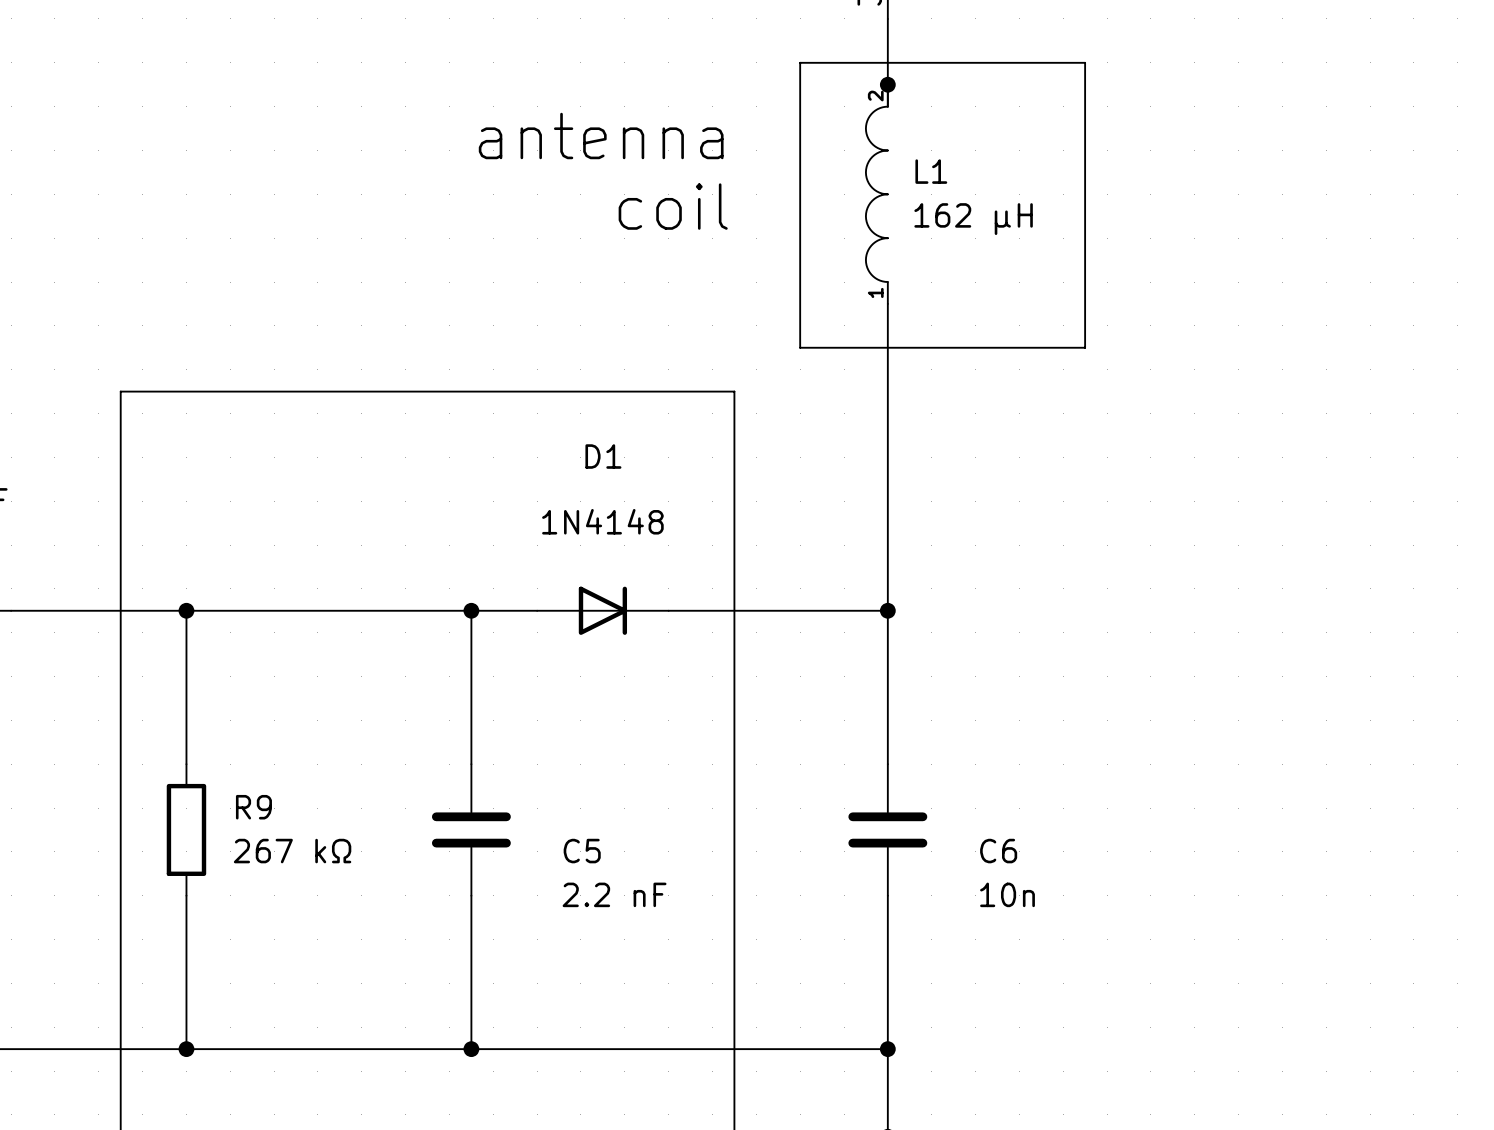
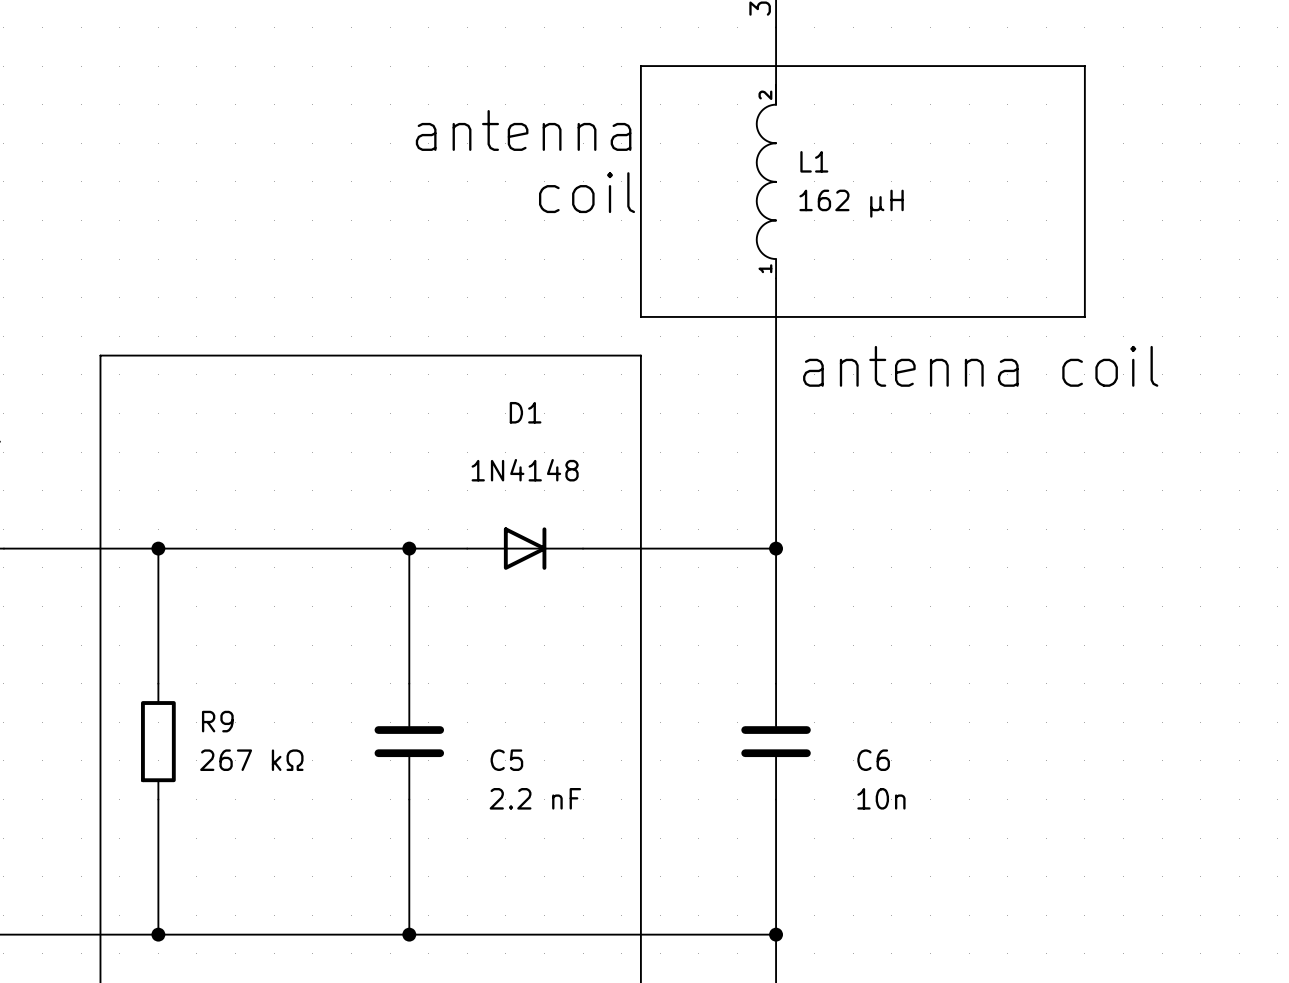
line: (800, 62) (800, 347) -> (698, 66) (640, 66) (640, 316) (698, 316)
line: (1085, 62) (1085, 347) -> (949, 66) (1084, 66) (1084, 316) (949, 316)
junction: (887, 84) -> none
text: none -> antenna coil (980, 366)

